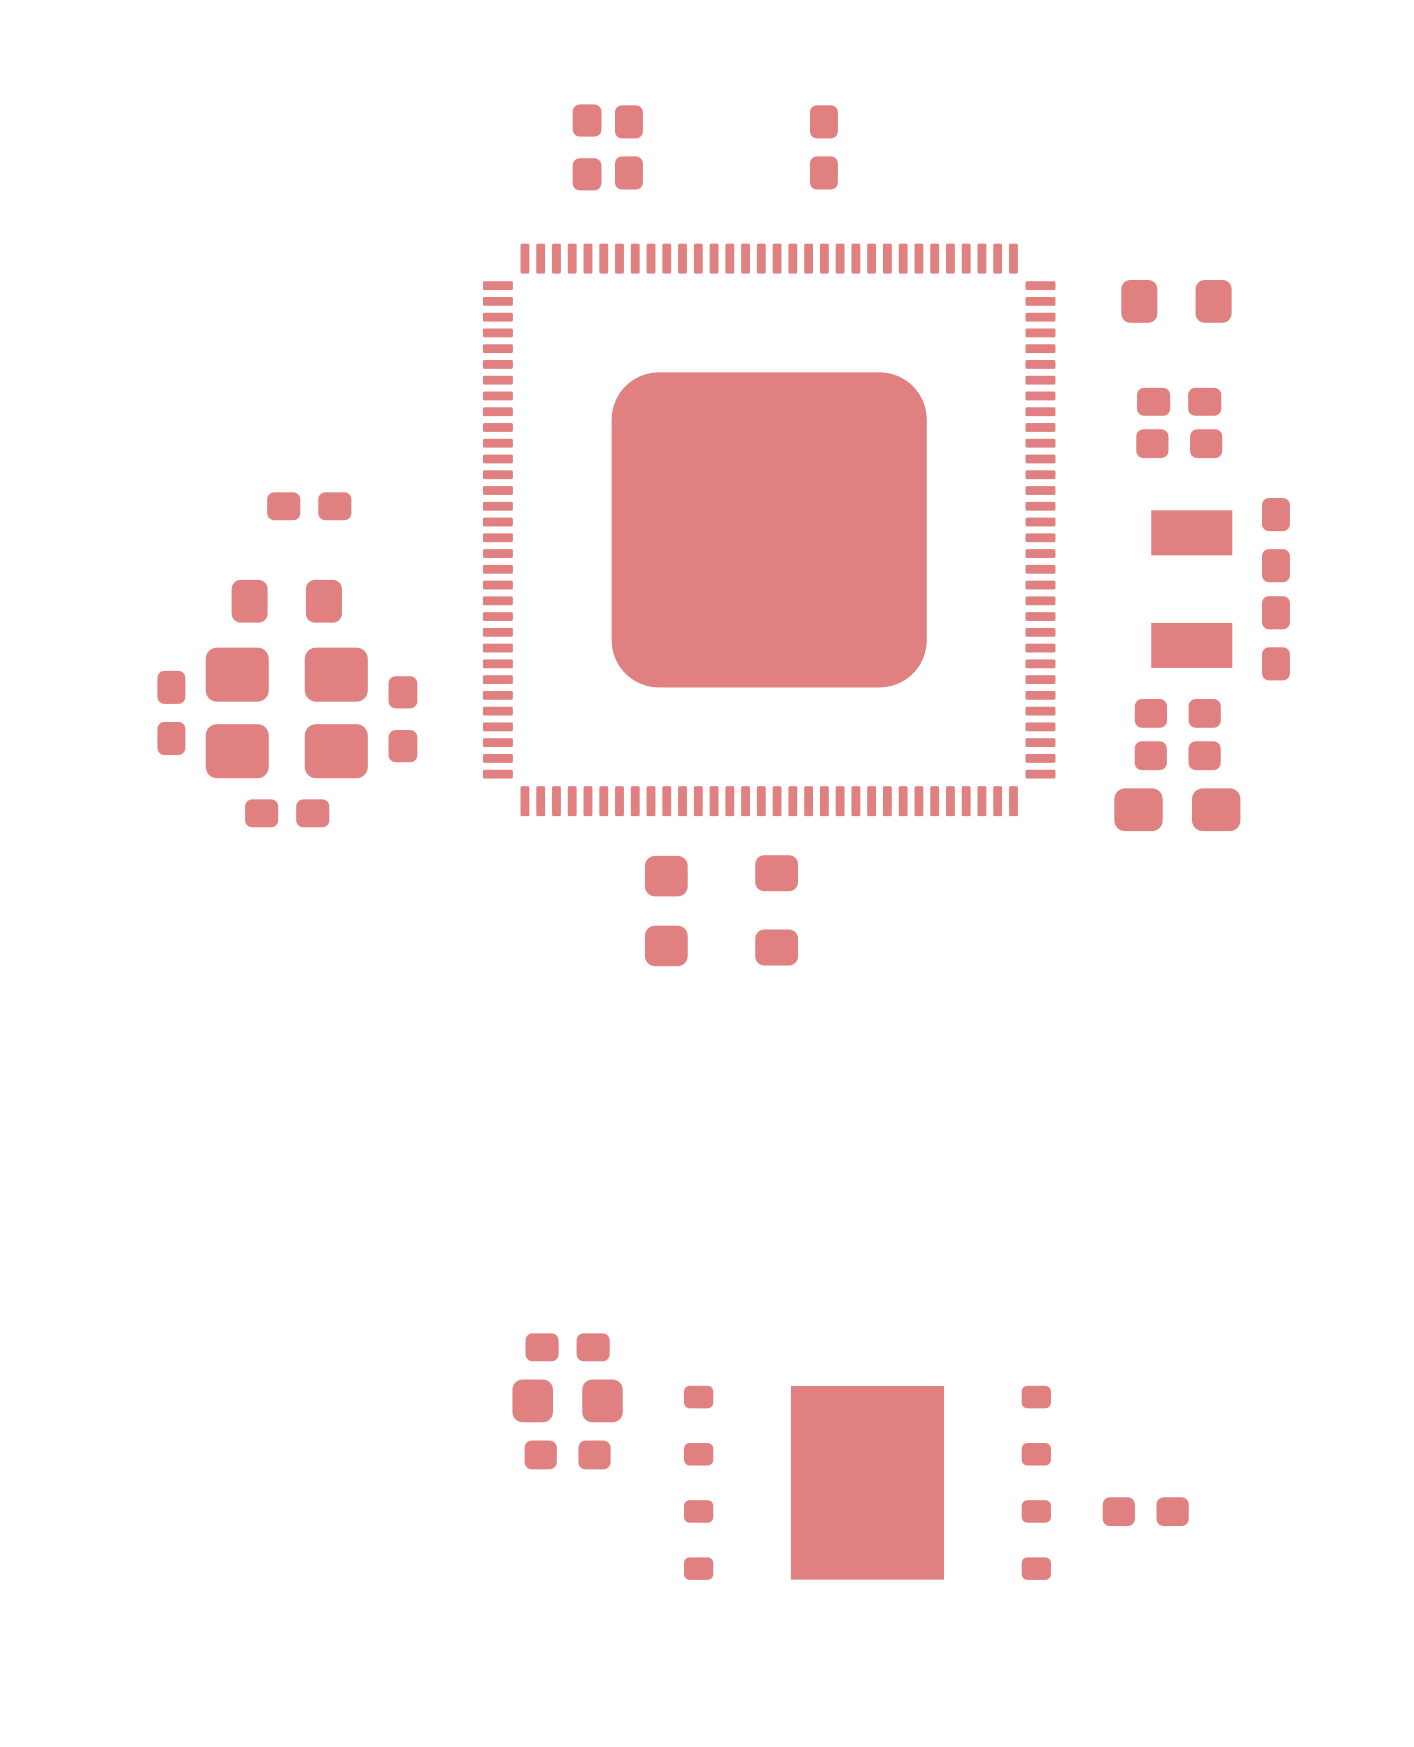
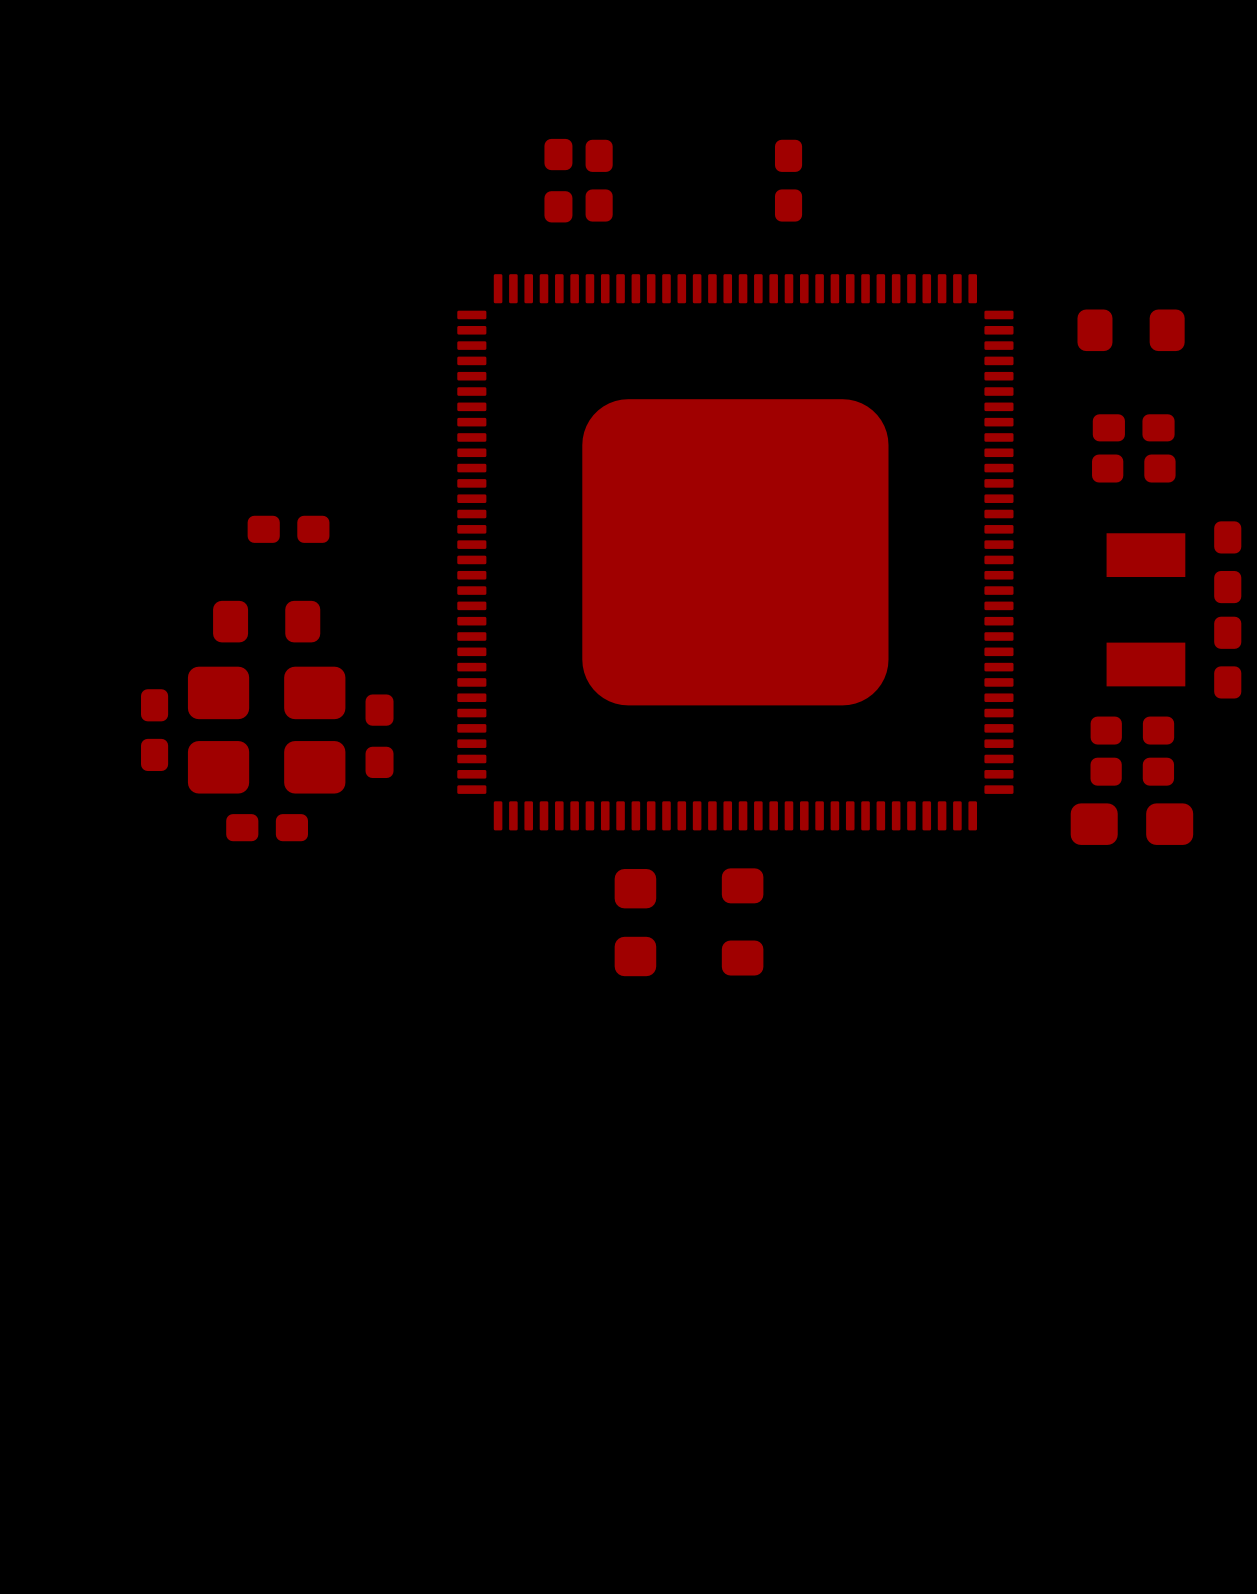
part: (567, 1347) -> none
part: (567, 1400) -> none
part: (567, 1454) -> none
part: (867, 1482) -> none
part: (1145, 1511) -> none

